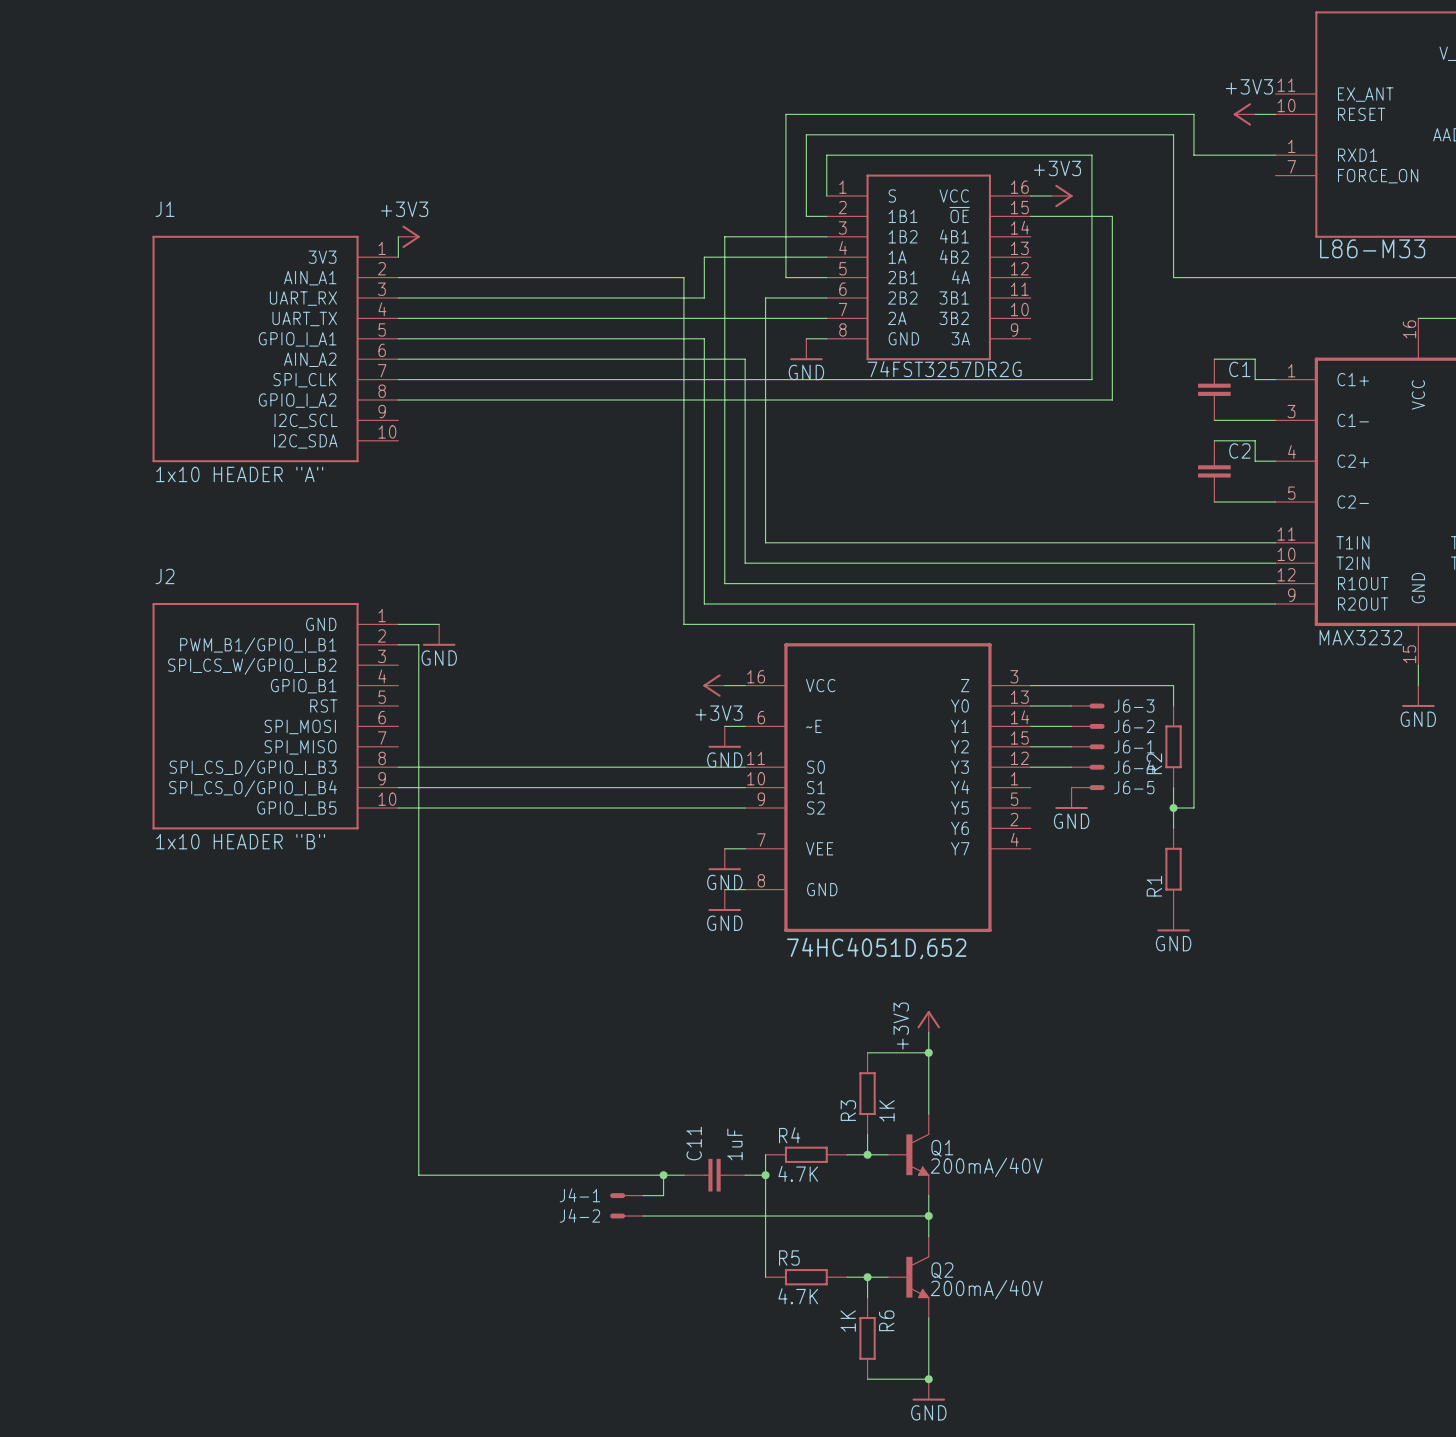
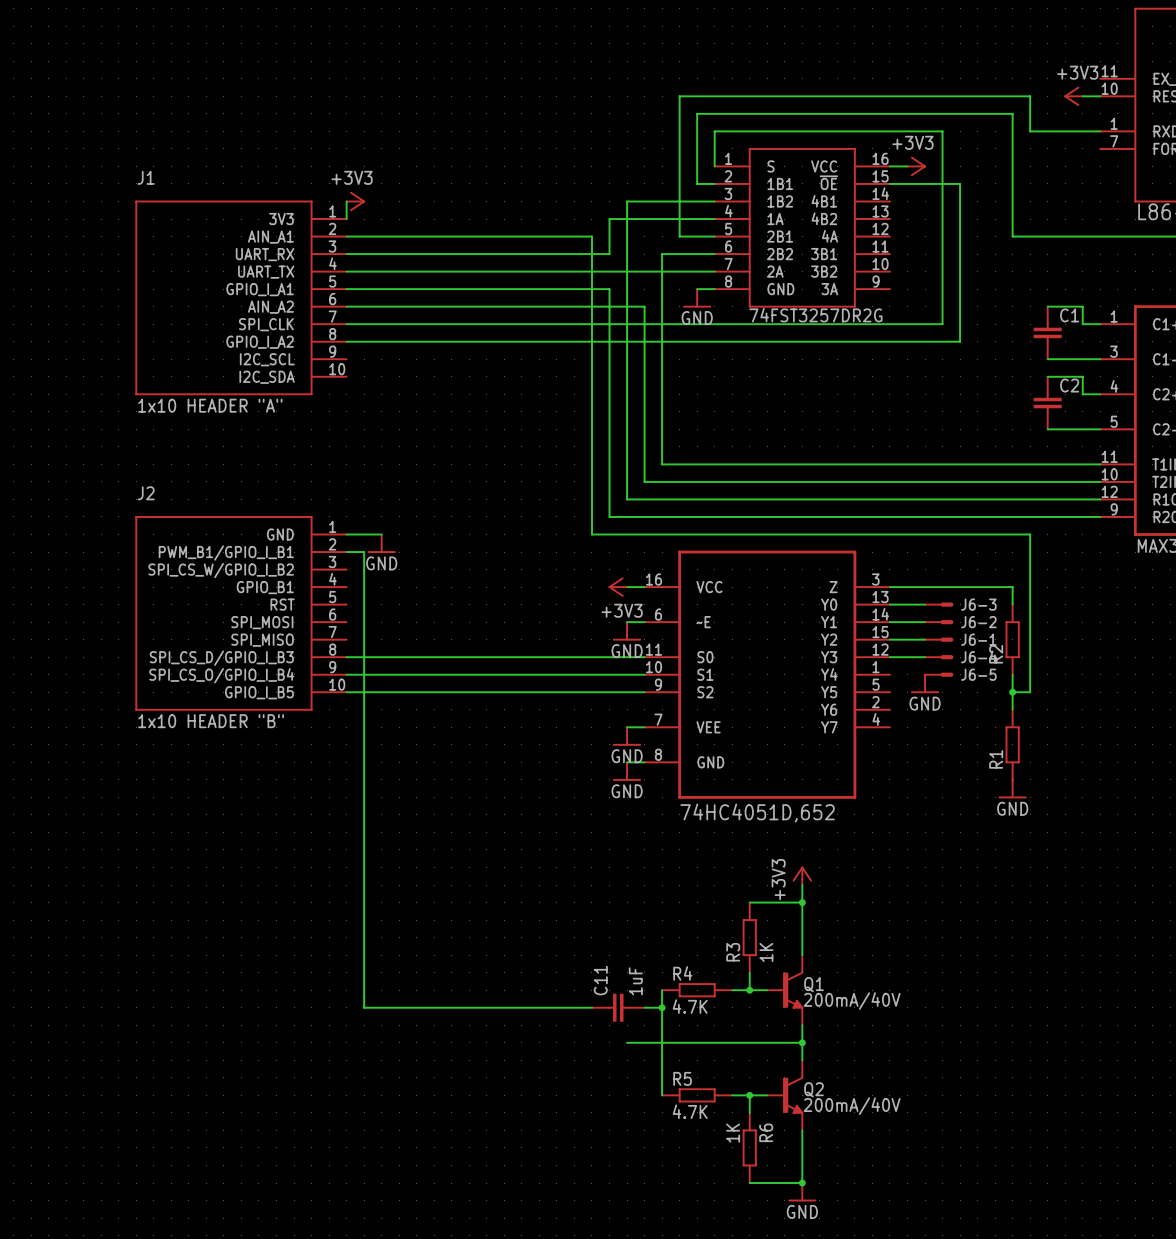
wire: (663, 1175) (663, 1195) (643, 1195) -> none
junction: (663, 1175) -> none
J4-1: (626, 1195) -> none
J4-2: (626, 1216) -> none
wire: (643, 1216) (724, 1216) -> none

